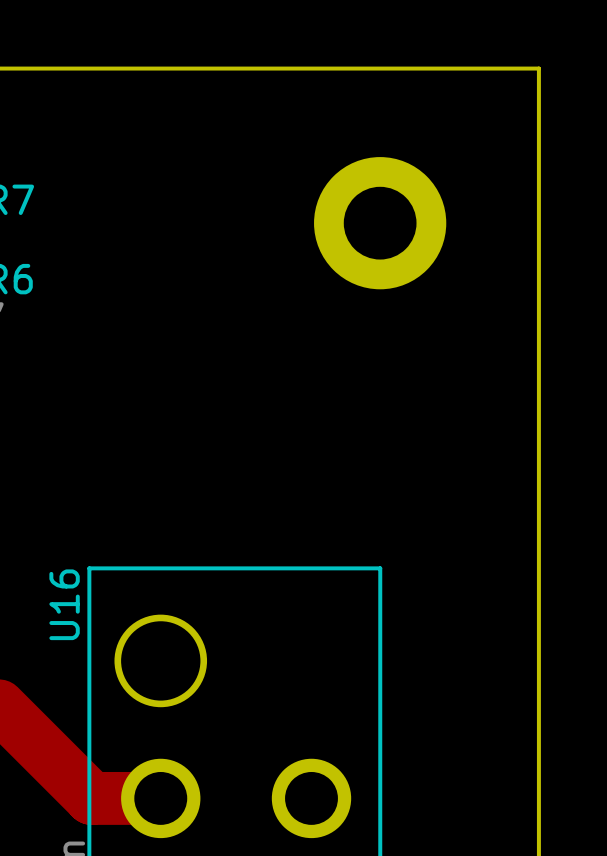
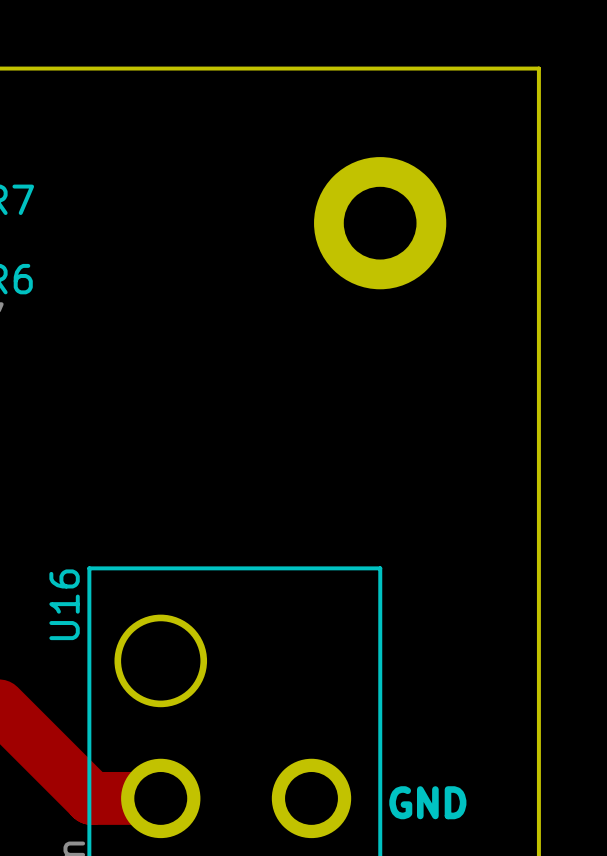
text: none -> GND (427, 802)

